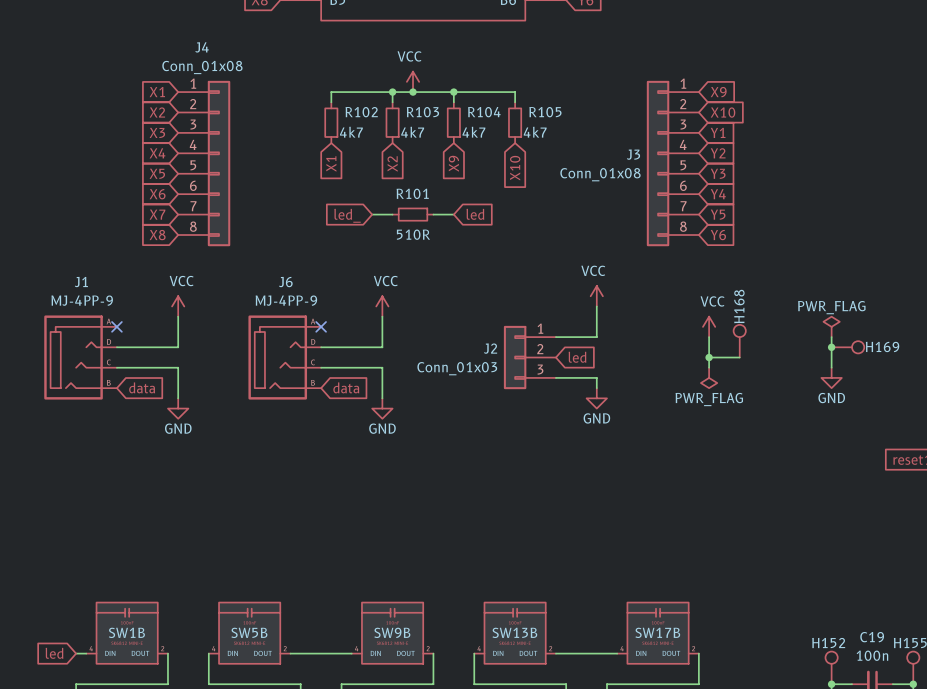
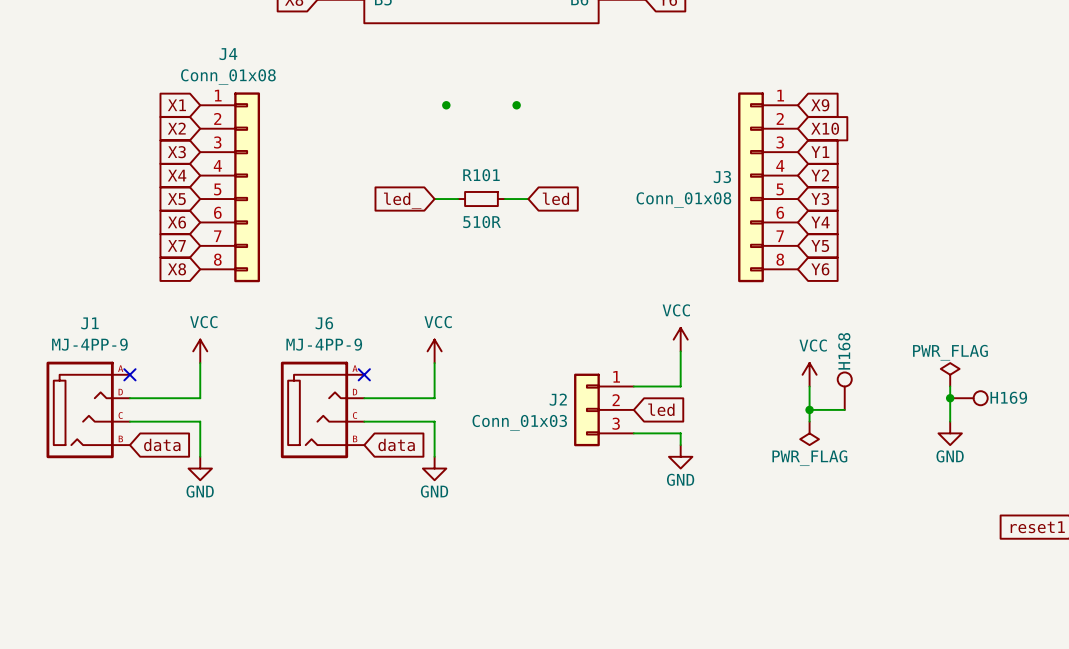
power symbol: VCC (413, 81) -> none
wire: (392, 92) (392, 102) -> none
junction: (413, 92) -> none
wire: (453, 92) (453, 102) -> none
wire: (331, 102) (331, 92) (515, 92) (515, 102) -> none
R102: 4k7 (331, 122) -> none
R103: 4k7 (392, 122) -> none
R104: 4k7 (453, 122) -> none
R105: 4k7 (515, 122) -> none
global label: X1 (331, 163) -> none
global label: X2 (392, 163) -> none
global label: X9 (453, 163) -> none
global label: X10 (515, 168) -> none
wire: (372, 214) (392, 214) -> (434, 199) (458, 199)
R101 position: (413, 214) -> (481, 199)
wire: (433, 214) (453, 214) -> (504, 199) (528, 199)
global label position: led (475, 214) -> led (555, 198)
global label position: led_ (347, 215) -> led_ (402, 200)

